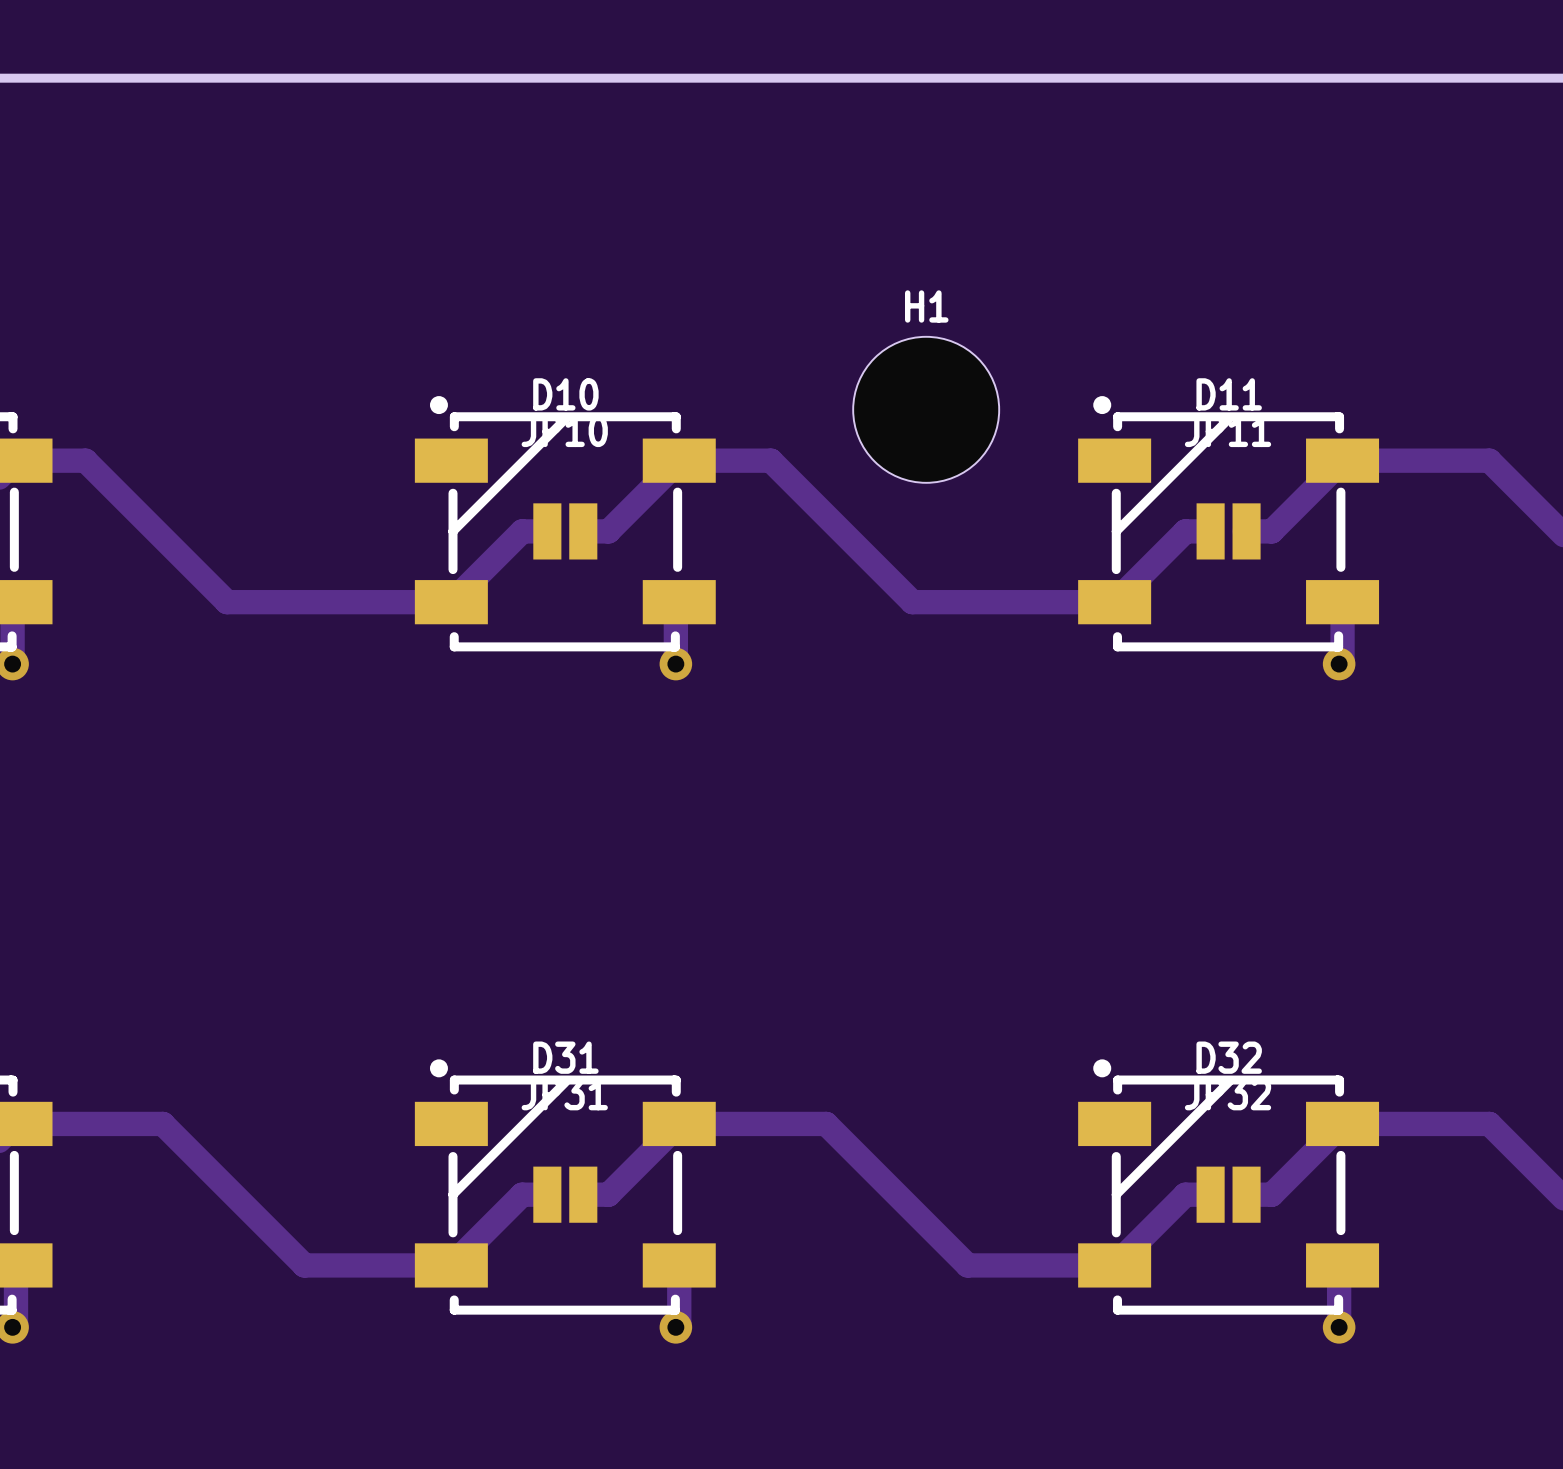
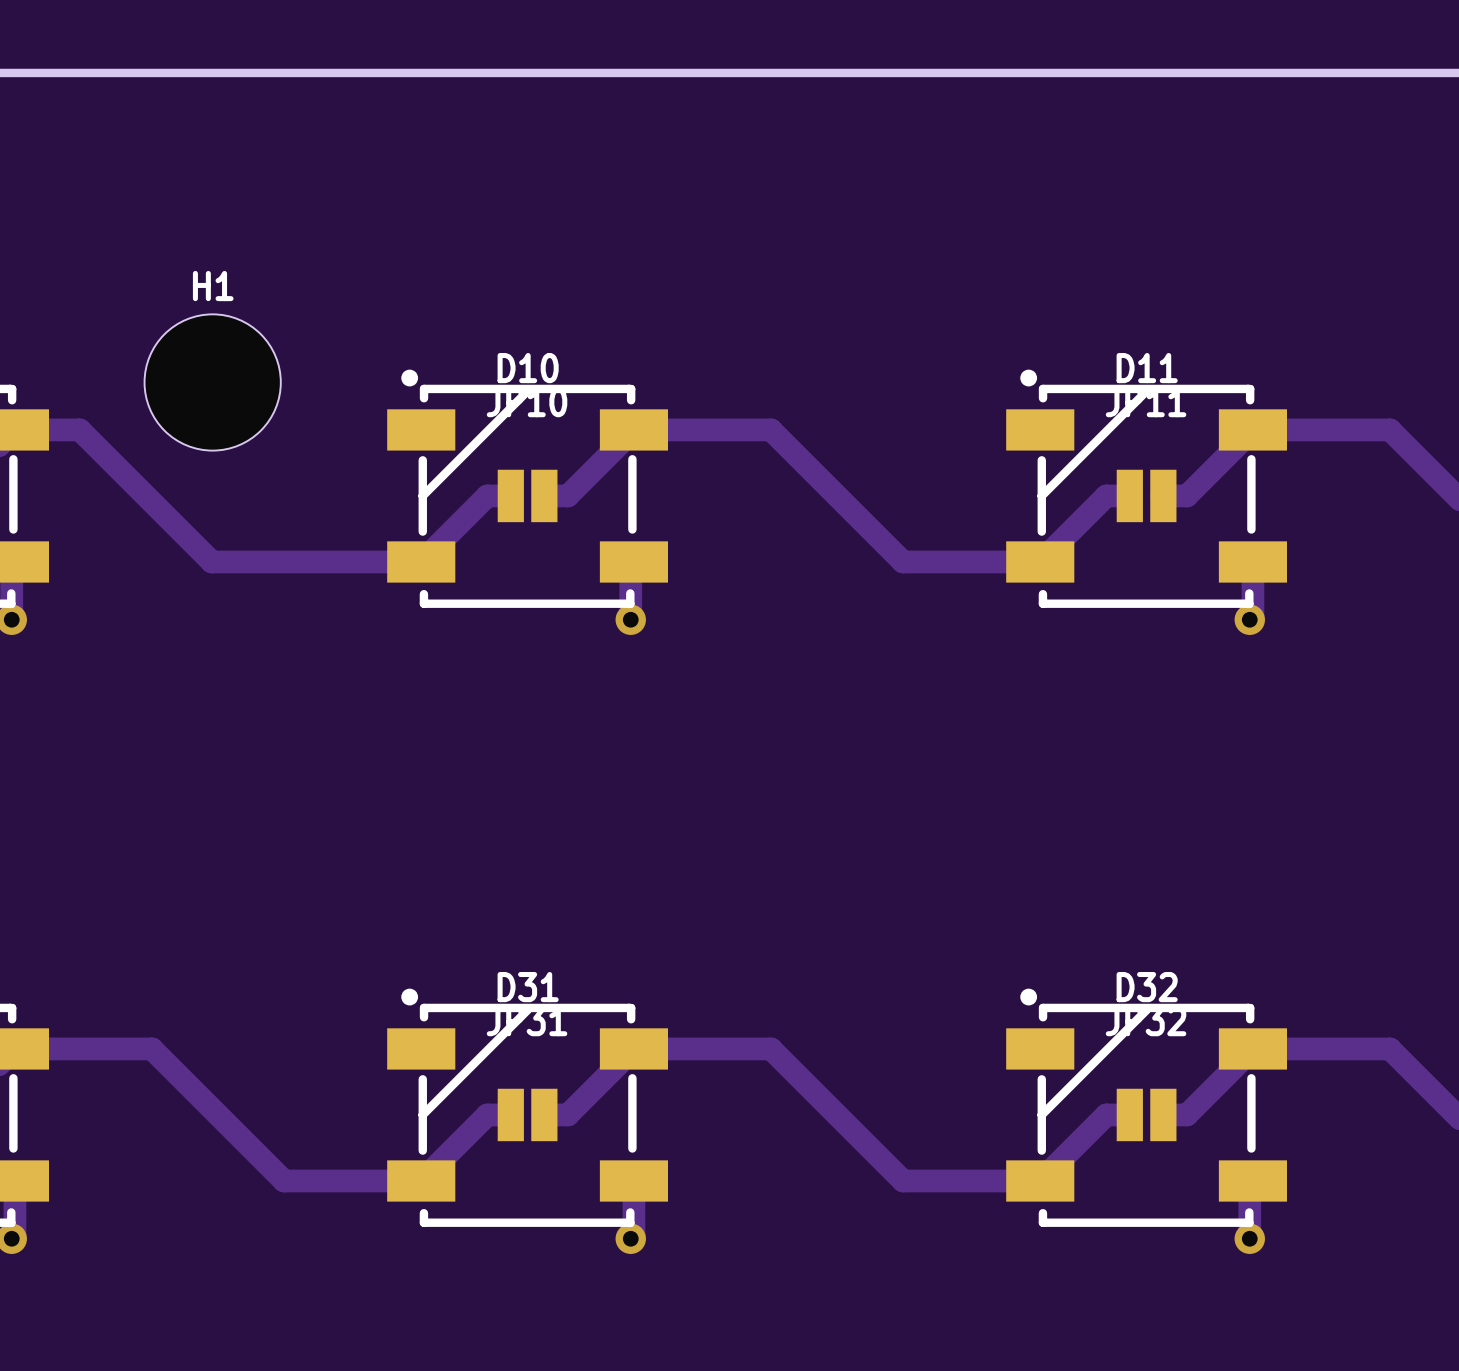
H1 position: (926, 409) -> (212, 382)
track: (770, 460) (912, 602) (967, 602) -> (719, 429) (771, 429) (903, 561)

